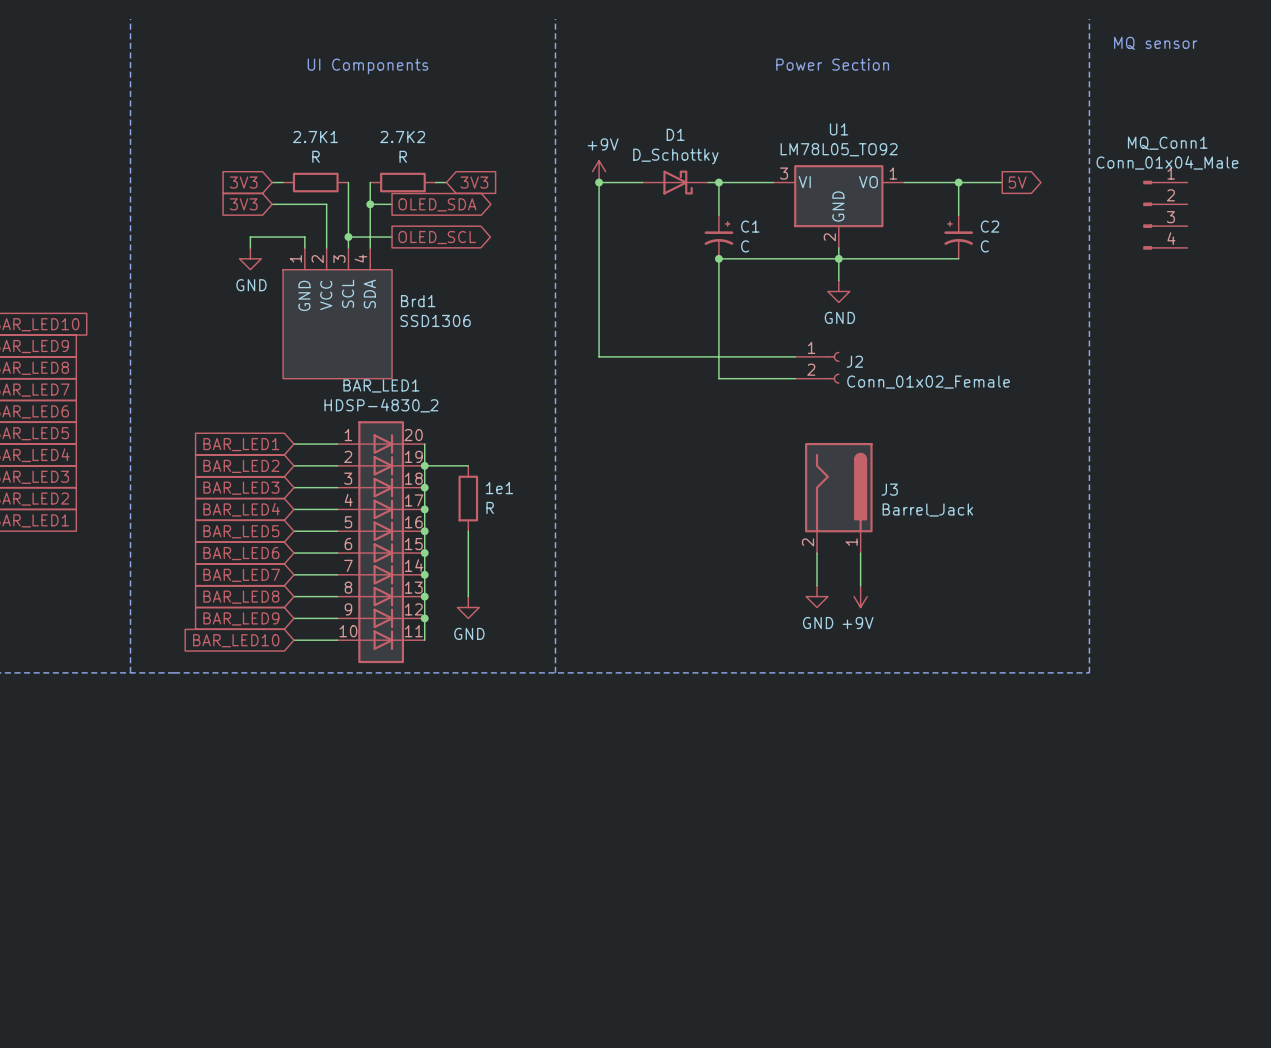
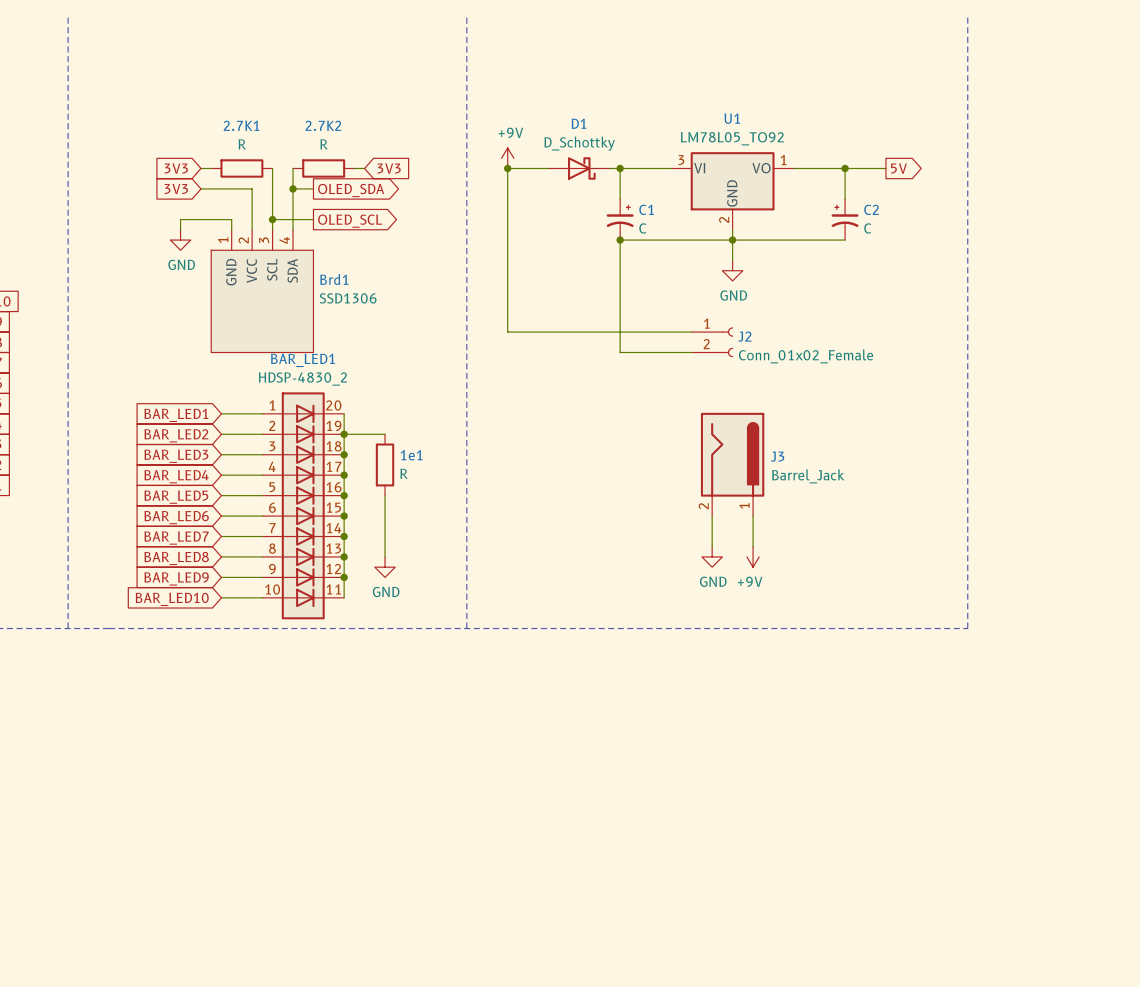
text: MQ sensor (1155, 43) -> none
text: Power Section (832, 64) -> none
text: UI Components (367, 66) -> none
MQ_Conn1: Conn_01x04_Male (1165, 215) -> none

